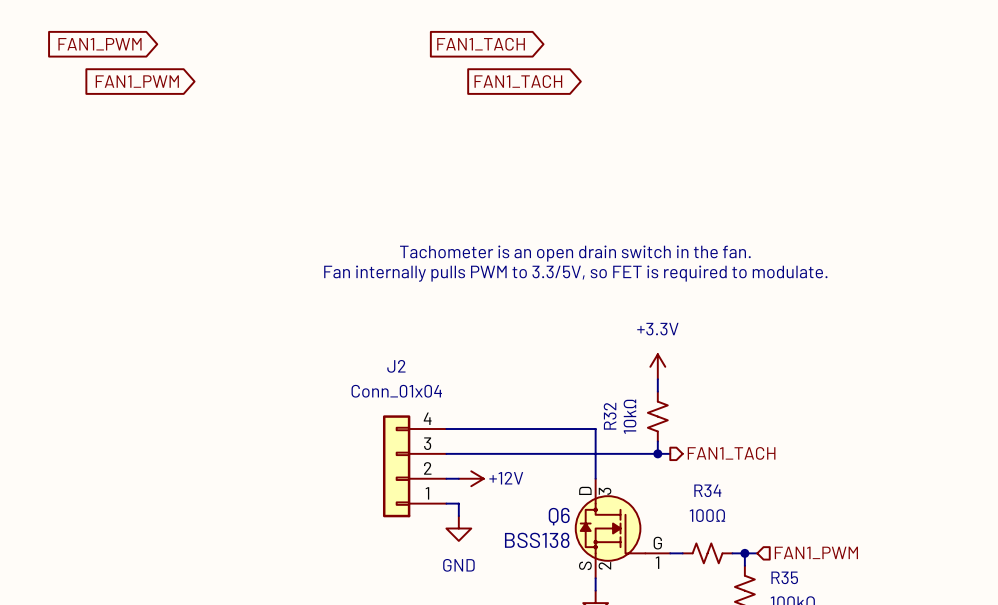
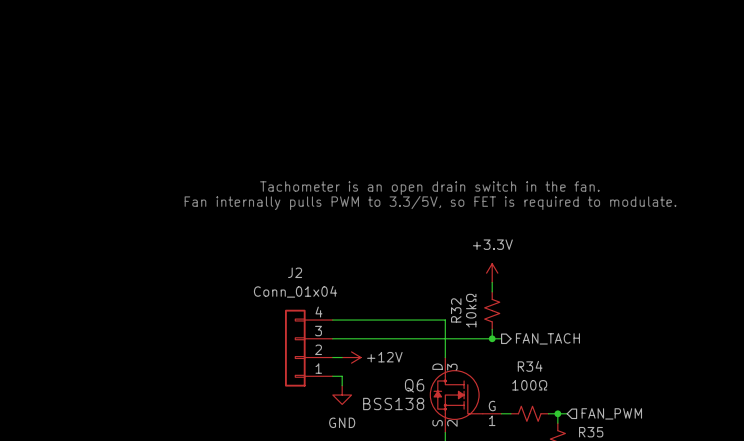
global label: FAN1_PWM (100, 44) -> none
global label: FAN1_TACH (481, 44) -> none
global label: FAN1_PWM (137, 81) -> none
global label: FAN1_TACH (518, 81) -> none
hierarchical label: FAN1_TACH (731, 453) -> FAN_TACH (547, 338)
hierarchical label: FAN1_PWM (816, 552) -> FAN_PWM (611, 413)

